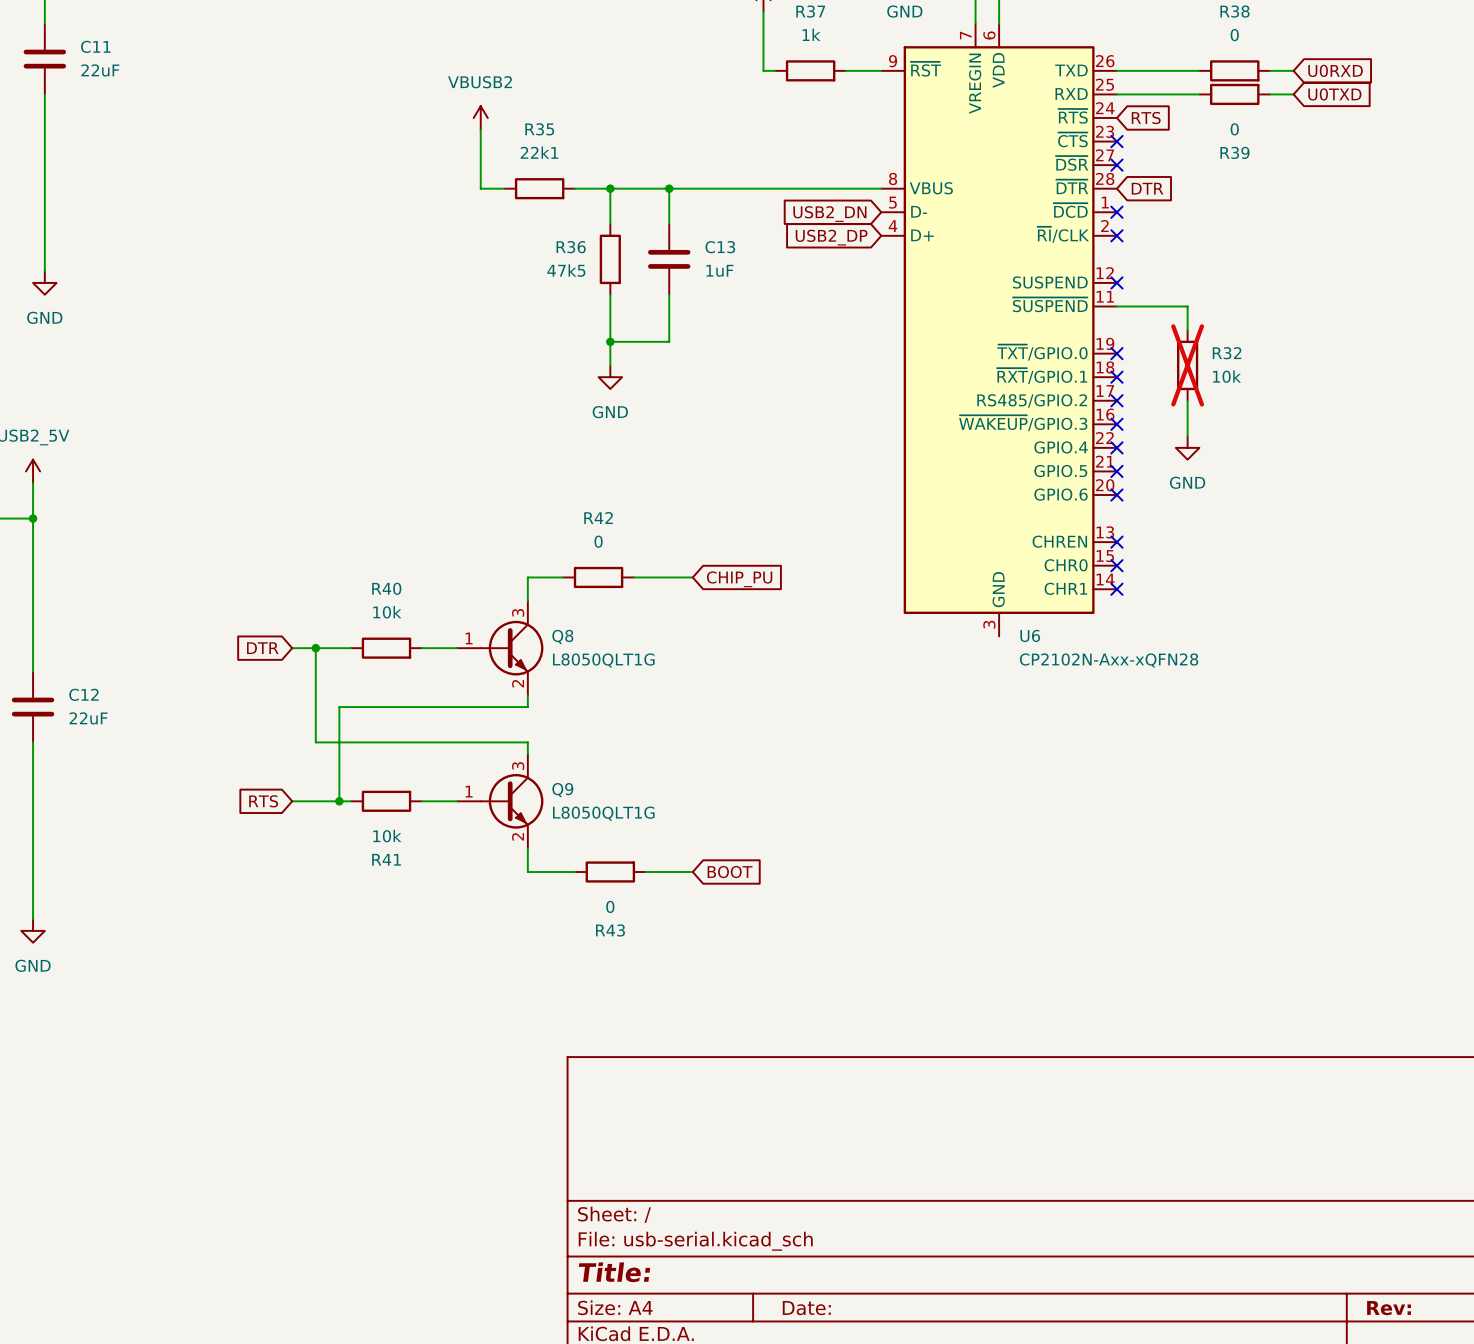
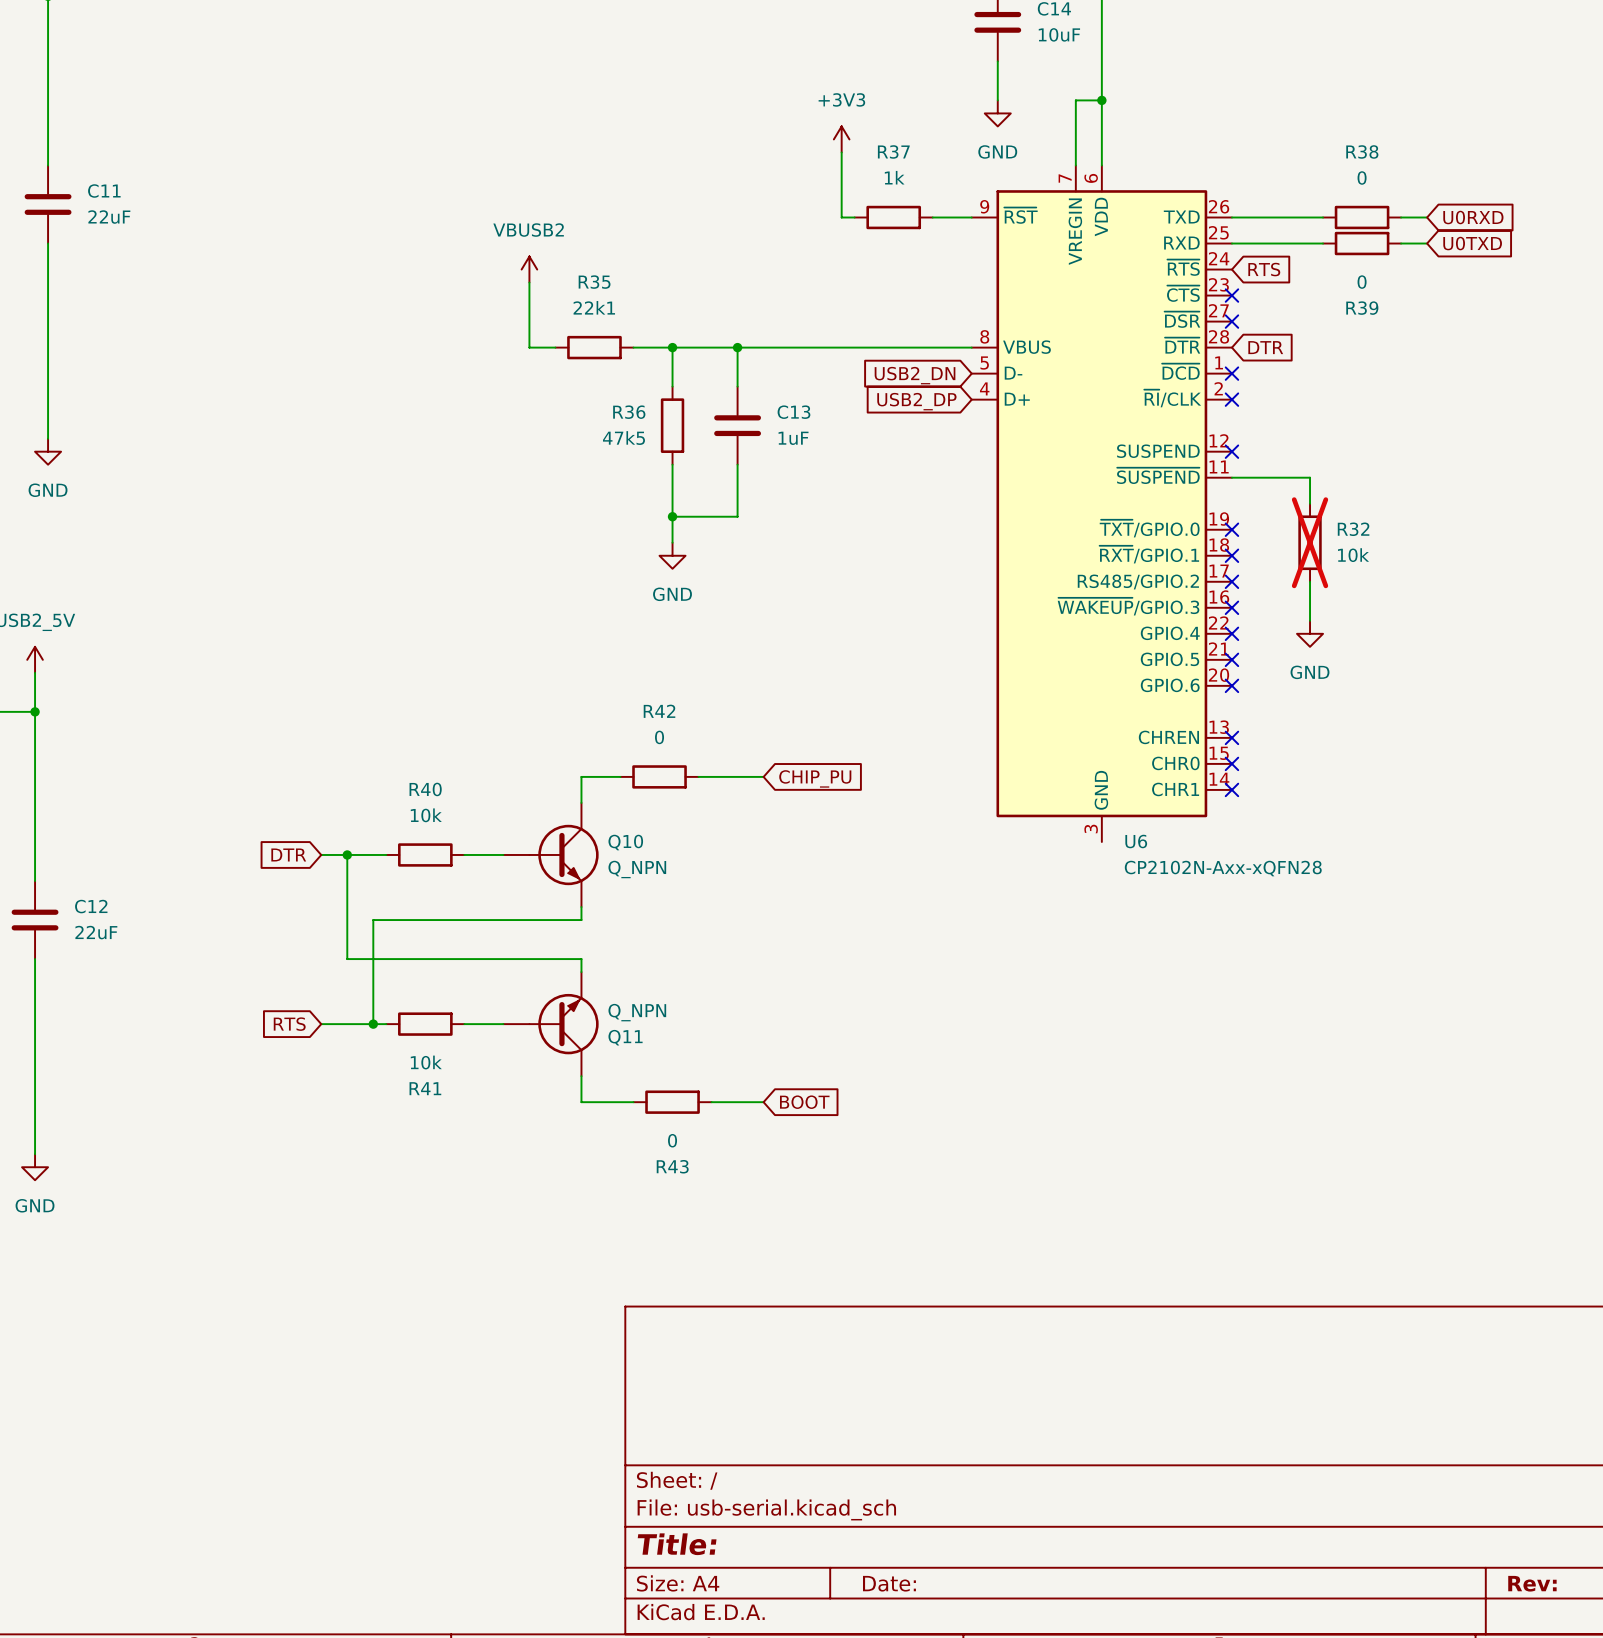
Q8 pin number: 3 (518, 612) -> none
Q8 name: Q8 (562, 636) -> Q10 (625, 842)
Q8 pin number: 1 (469, 638) -> none
Q8 value: L8050QLT1G (603, 660) -> Q_NPN (637, 869)
Q8 pin number: 2 (518, 683) -> none
Q9: L8050QLT1G (500, 801) -> none
Q11: none -> Q_NPN (551, 1024)

